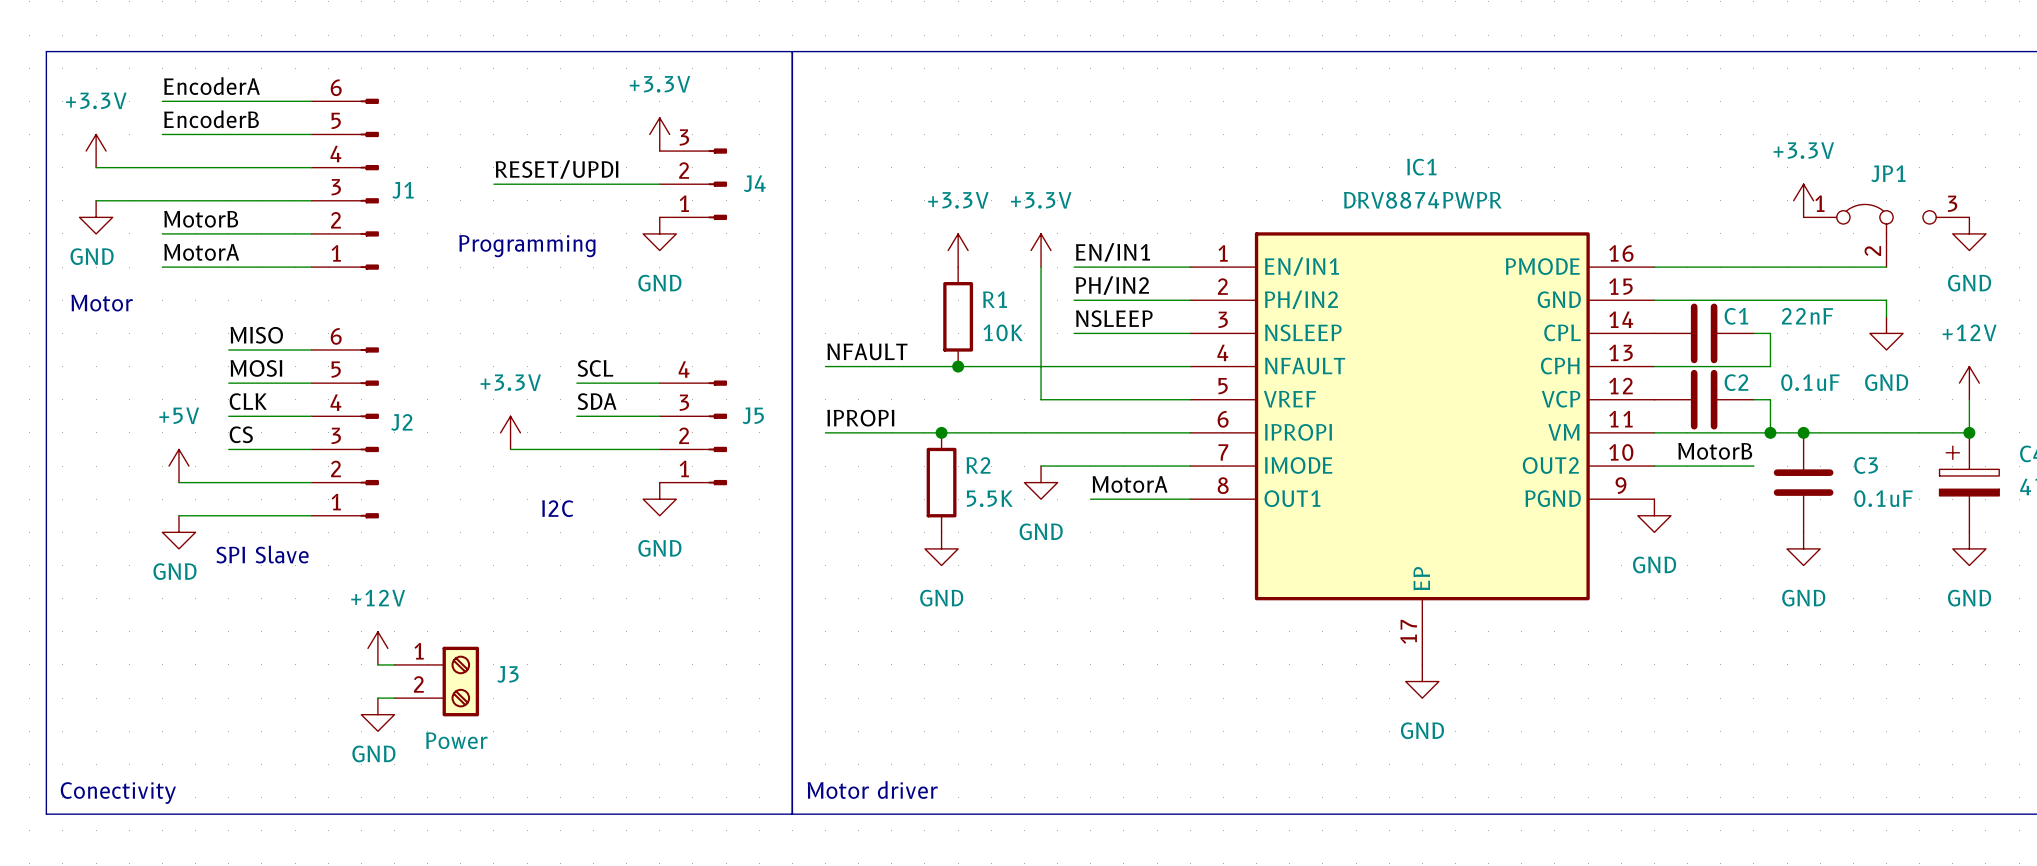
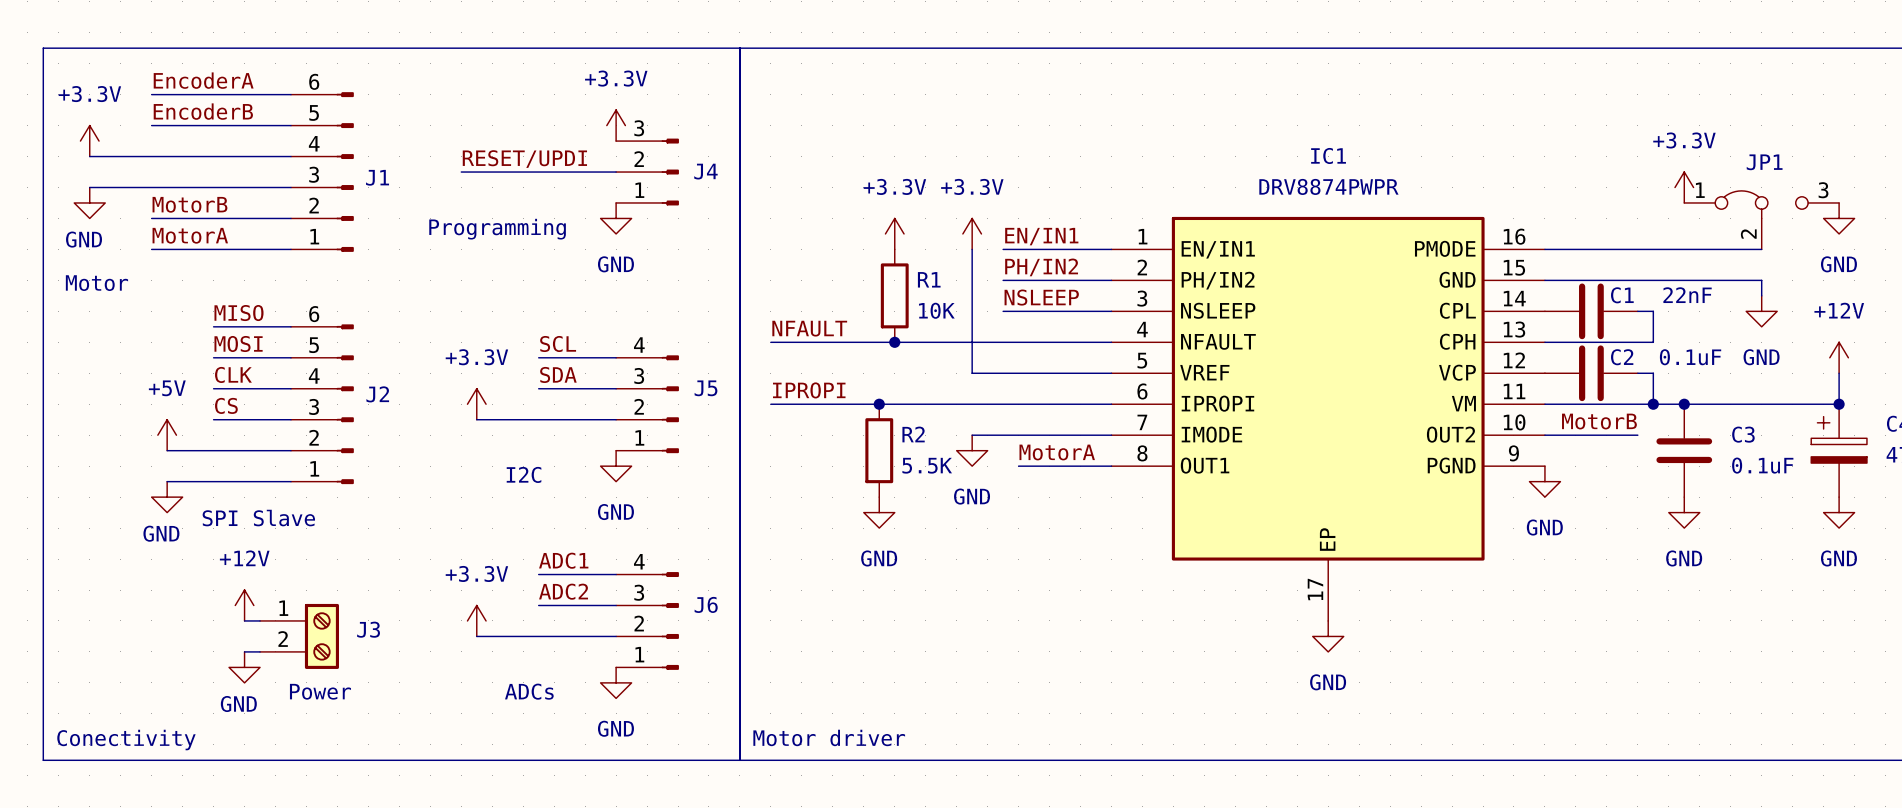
label: none -> ADC1 (563, 560)
wire: none -> (538, 574) (616, 574)
label: none -> ADC2 (563, 591)
power symbol position: +12V (377, 648) -> +12V (244, 605)
wire: none -> (538, 605) (616, 605)
wire: (377, 664) (394, 664) -> (244, 620) (260, 620)
power symbol: none -> +3.3V (476, 620)
J6: none -> (647, 620)
J3 position: (436, 681) -> (299, 636)
wire: none -> (476, 636) (616, 636)
wire: (377, 698) (394, 698) -> (244, 651) (260, 651)
power symbol position: GND (377, 714) -> GND (244, 667)
power symbol: none -> GND (616, 682)
text: none -> ADCs (529, 691)

